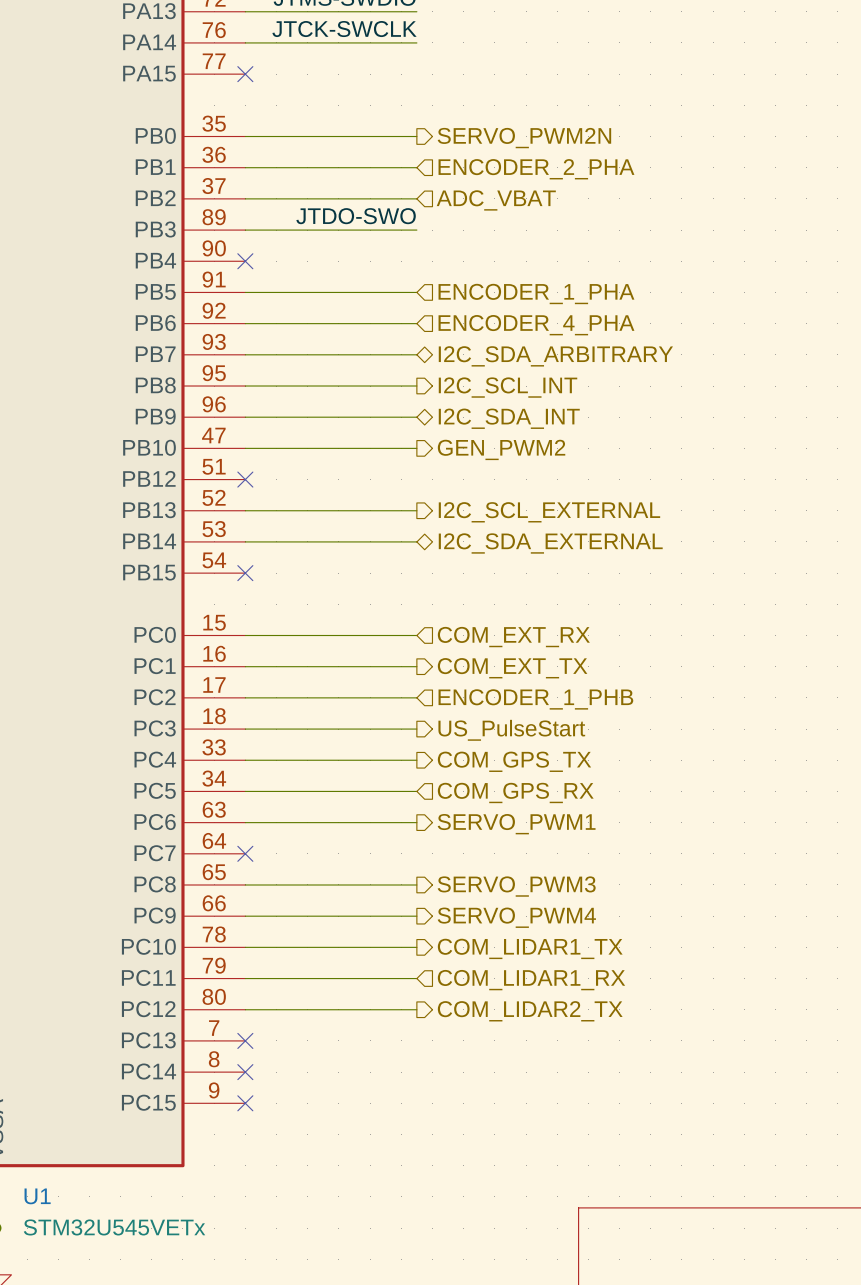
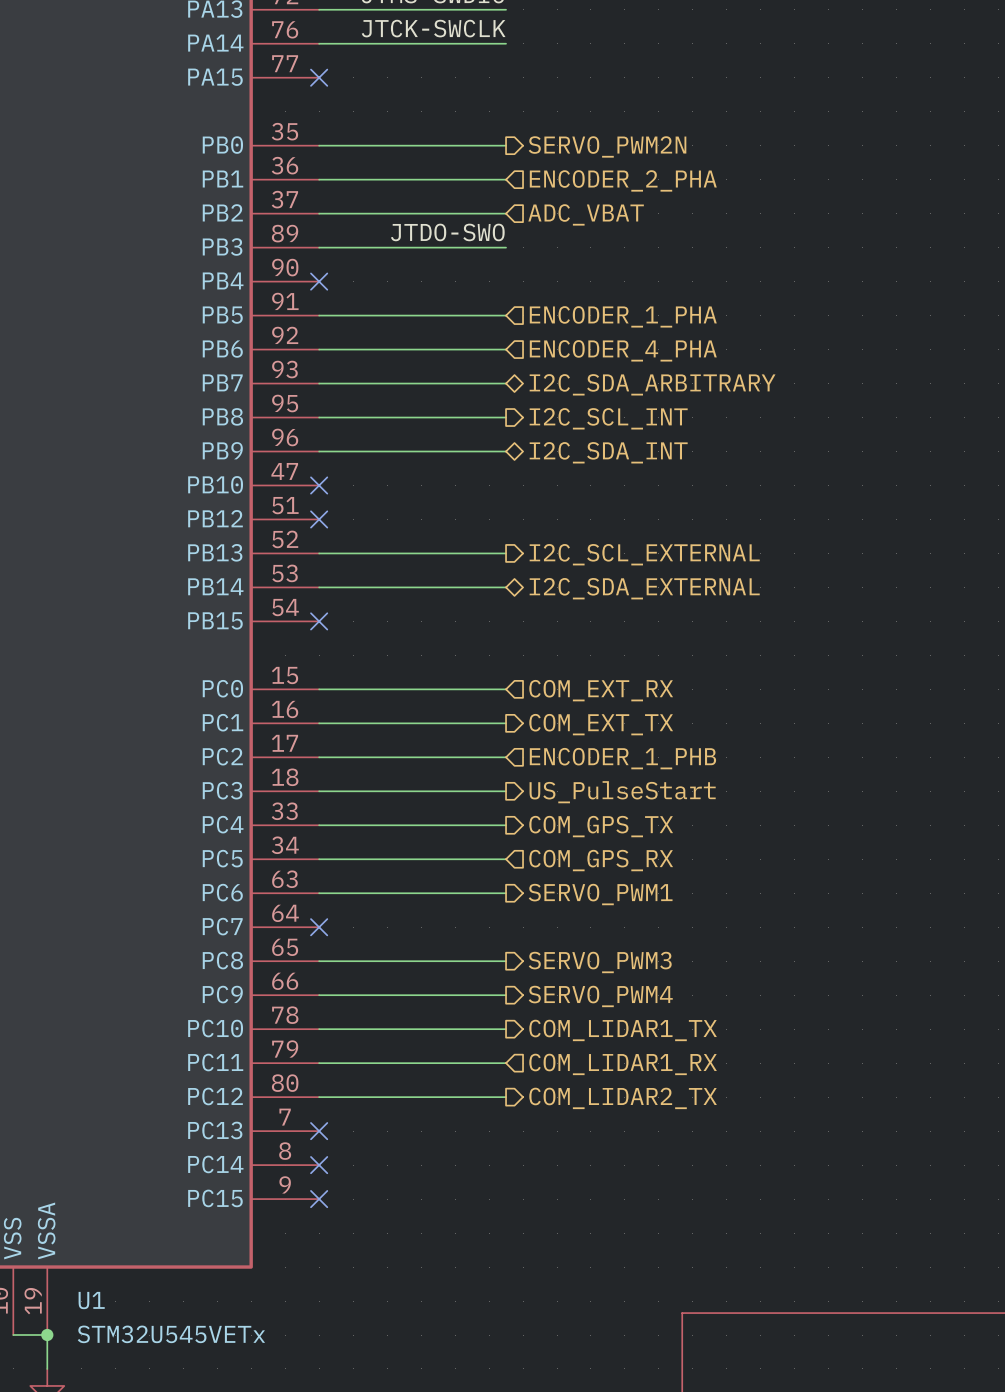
wire: (245, 448) (416, 448) -> none
no-connect mark: none -> (319, 485)
hierarchical label: GEN_PWM2 (501, 449) -> none

